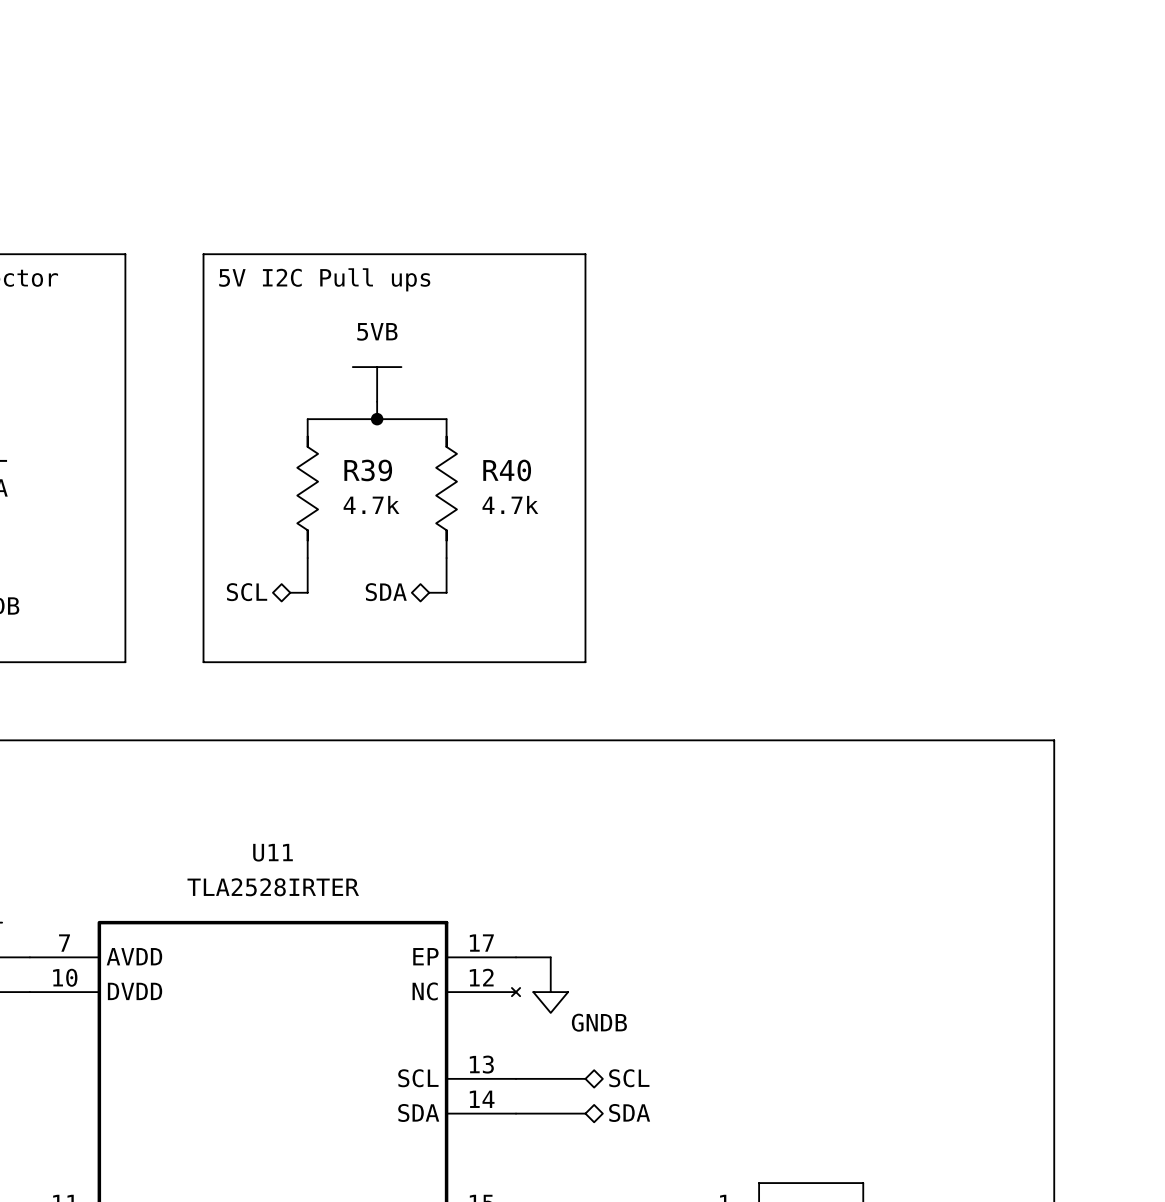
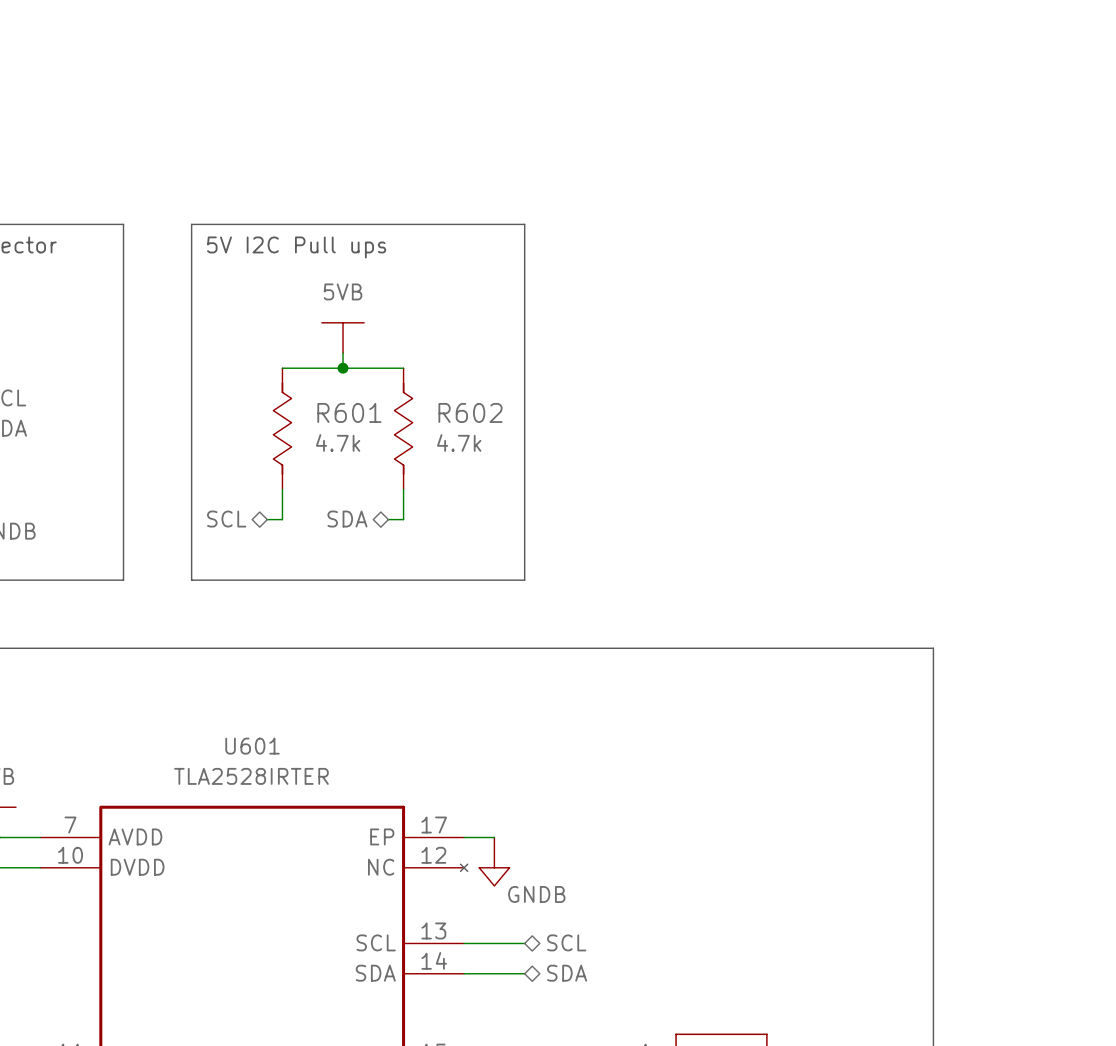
R39 name: R39 (368, 470) -> R601 (349, 412)
R40 name: R40 (507, 470) -> R602 (470, 412)
U11 name: U11 (273, 852) -> U601 (252, 746)

